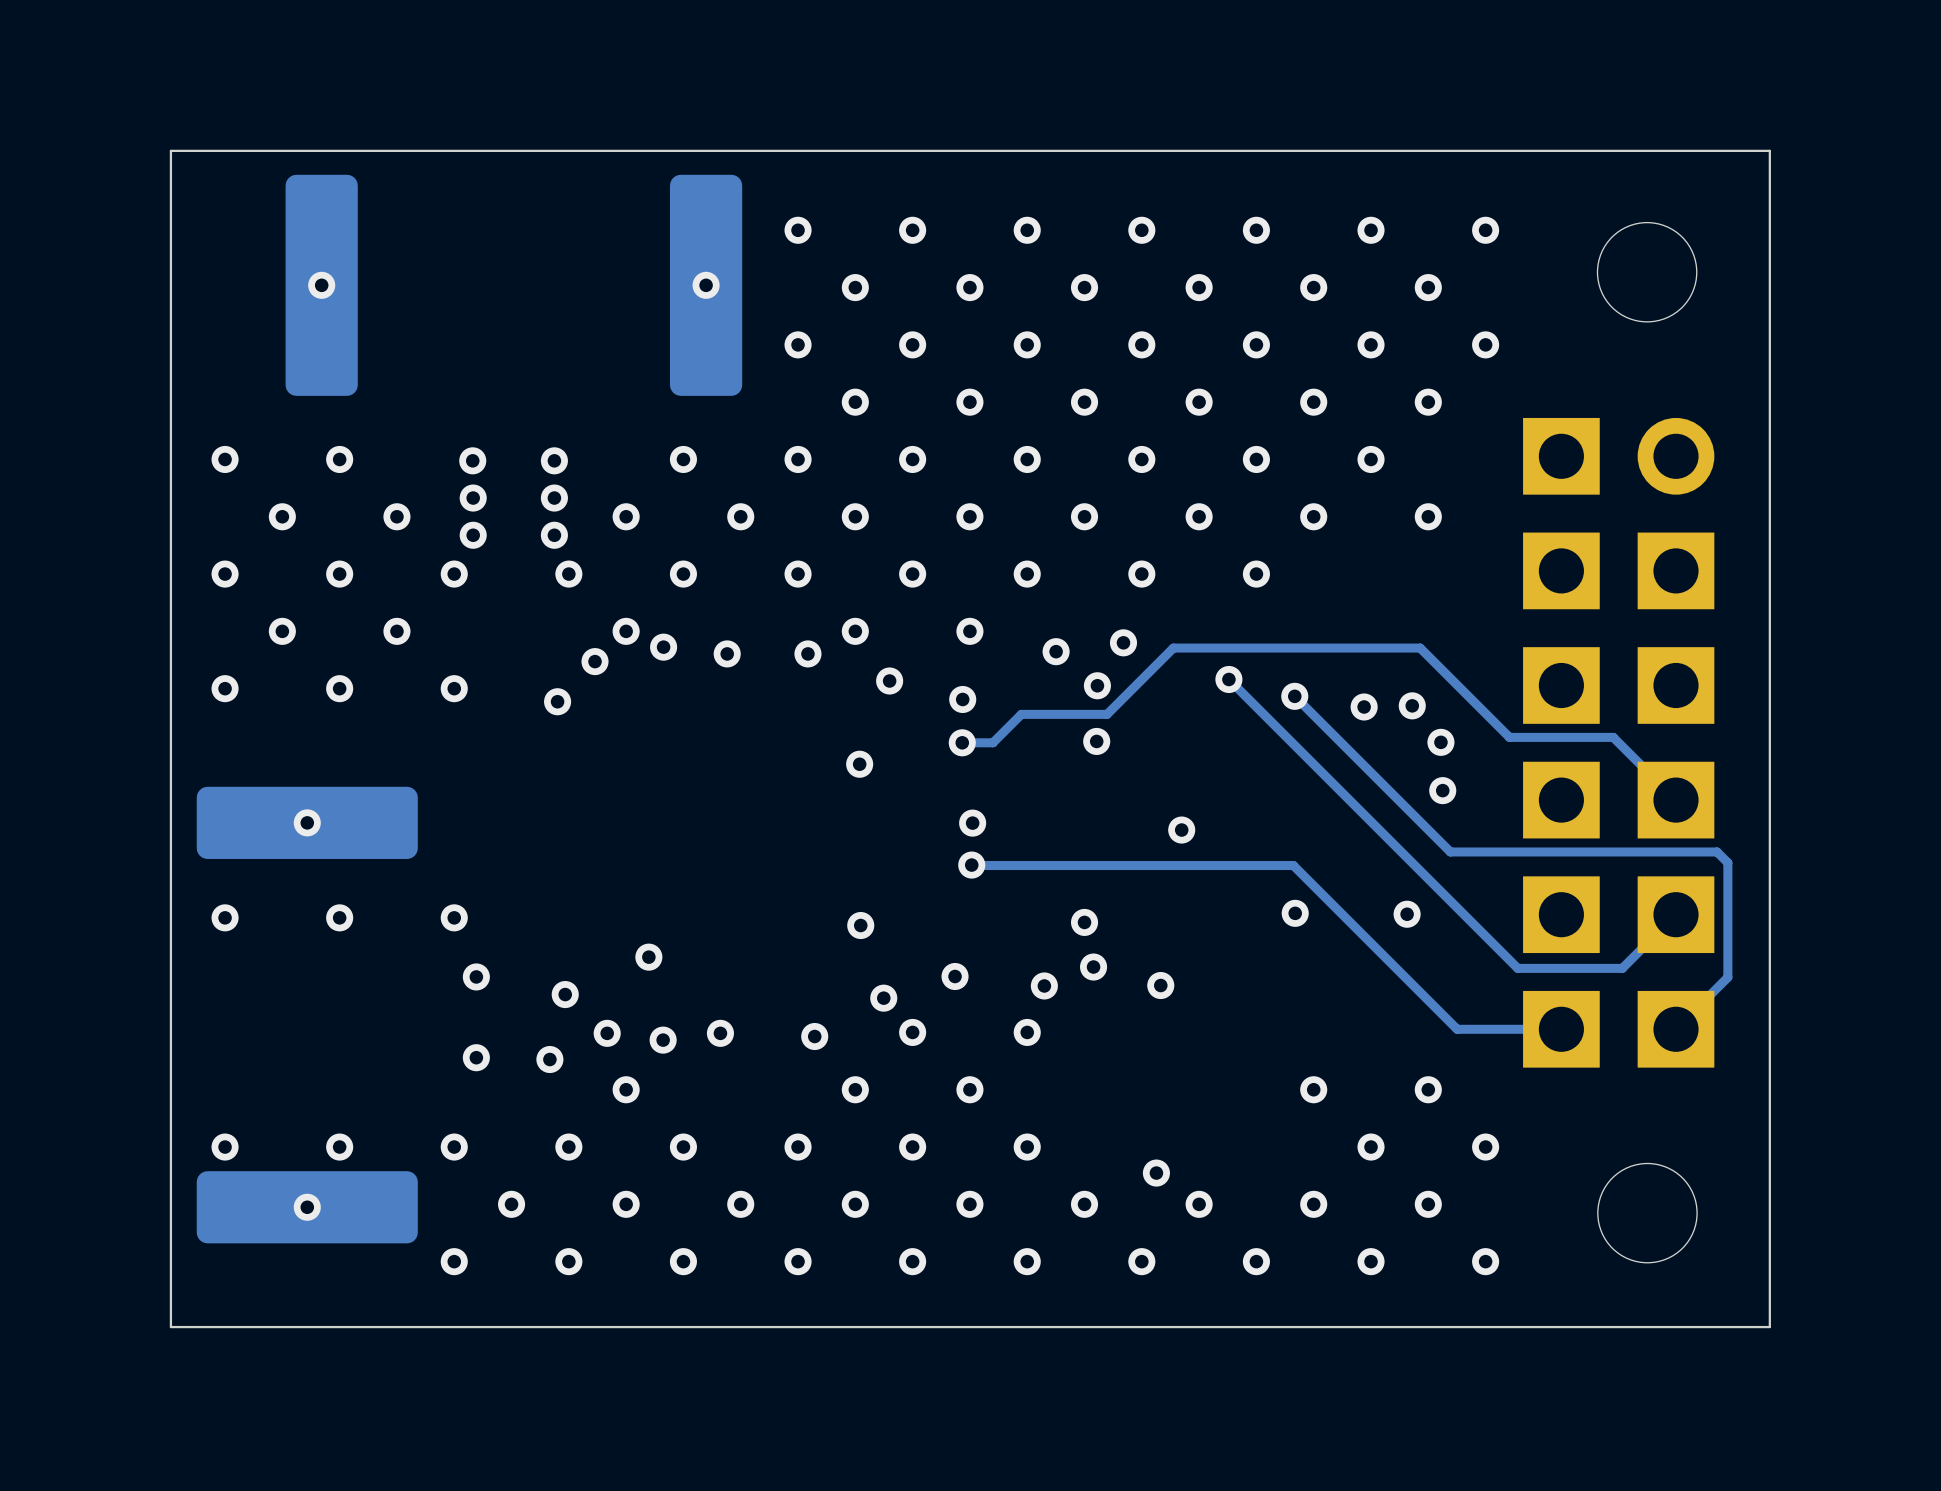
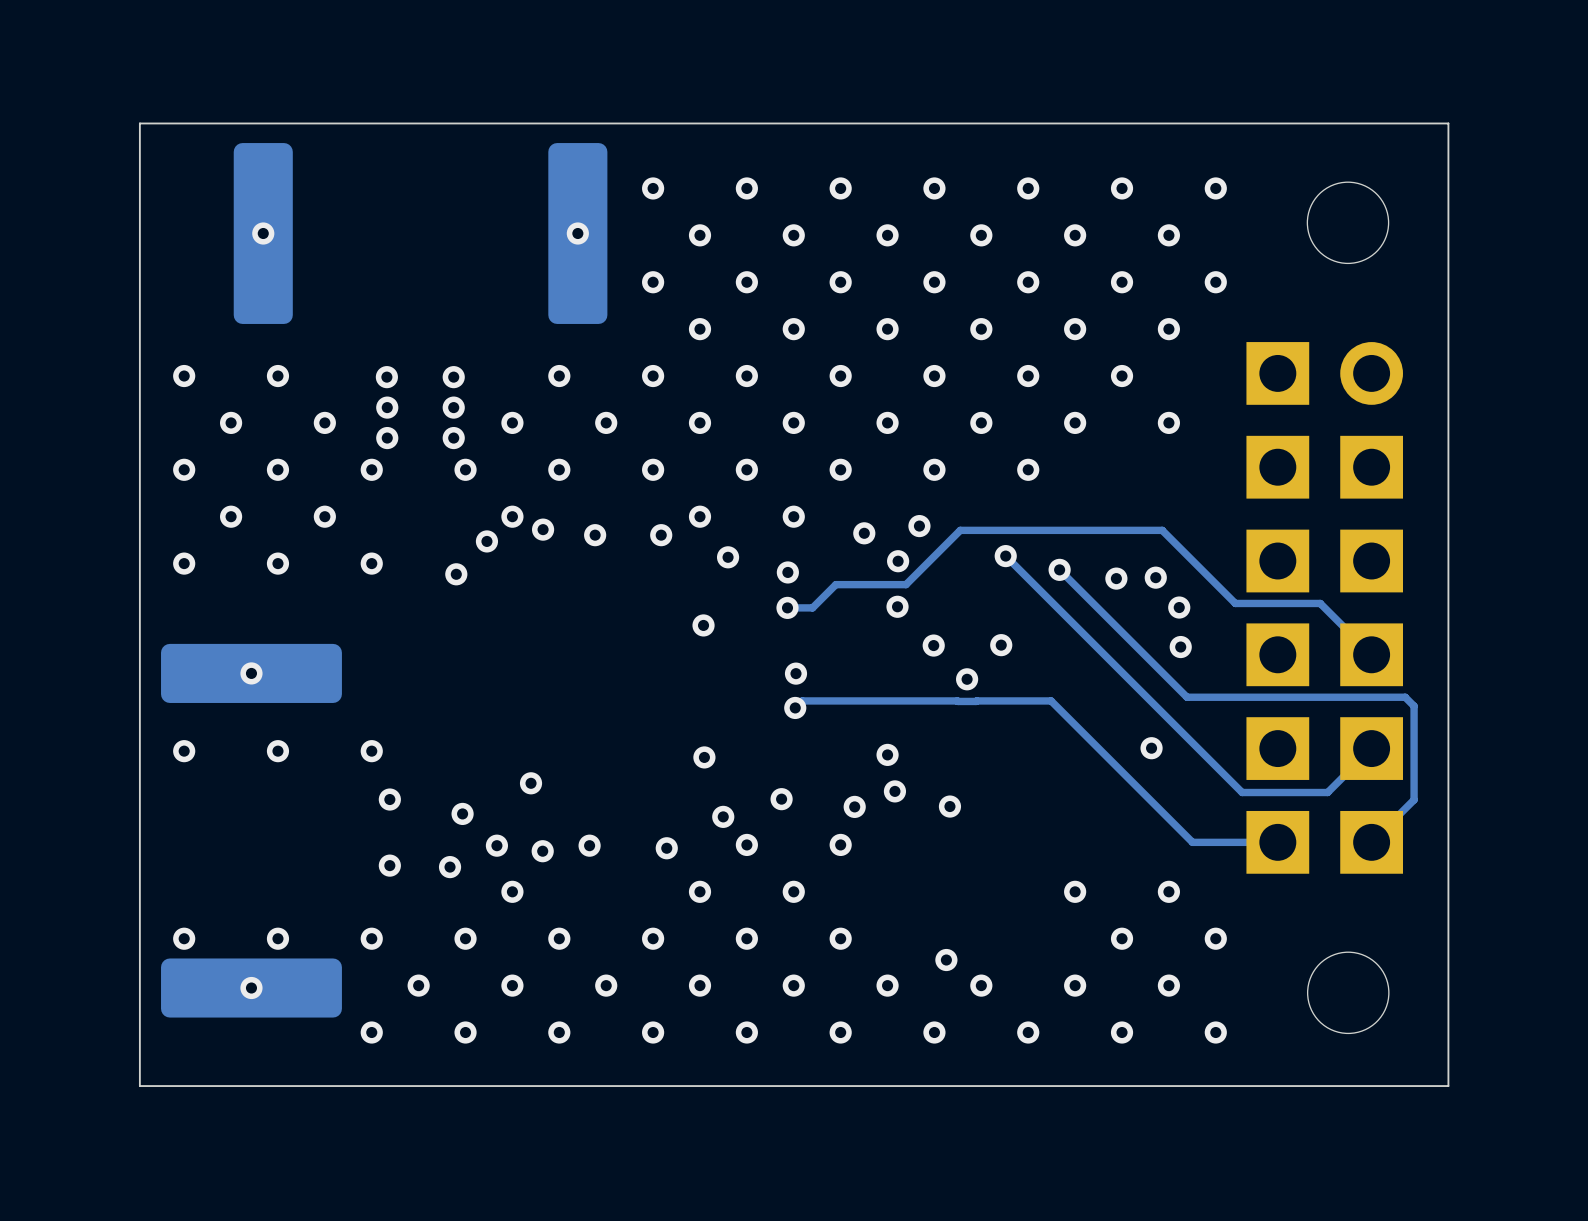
via: none -> (933, 645)
via: none -> (1001, 645)
track: none -> (976, 700) (1051, 700) (1058, 708)
track: none -> (976, 701) (957, 701)
track: (1293, 865) (972, 865) -> (957, 700) (802, 700) (795, 707)
via: (1295, 913) -> none

